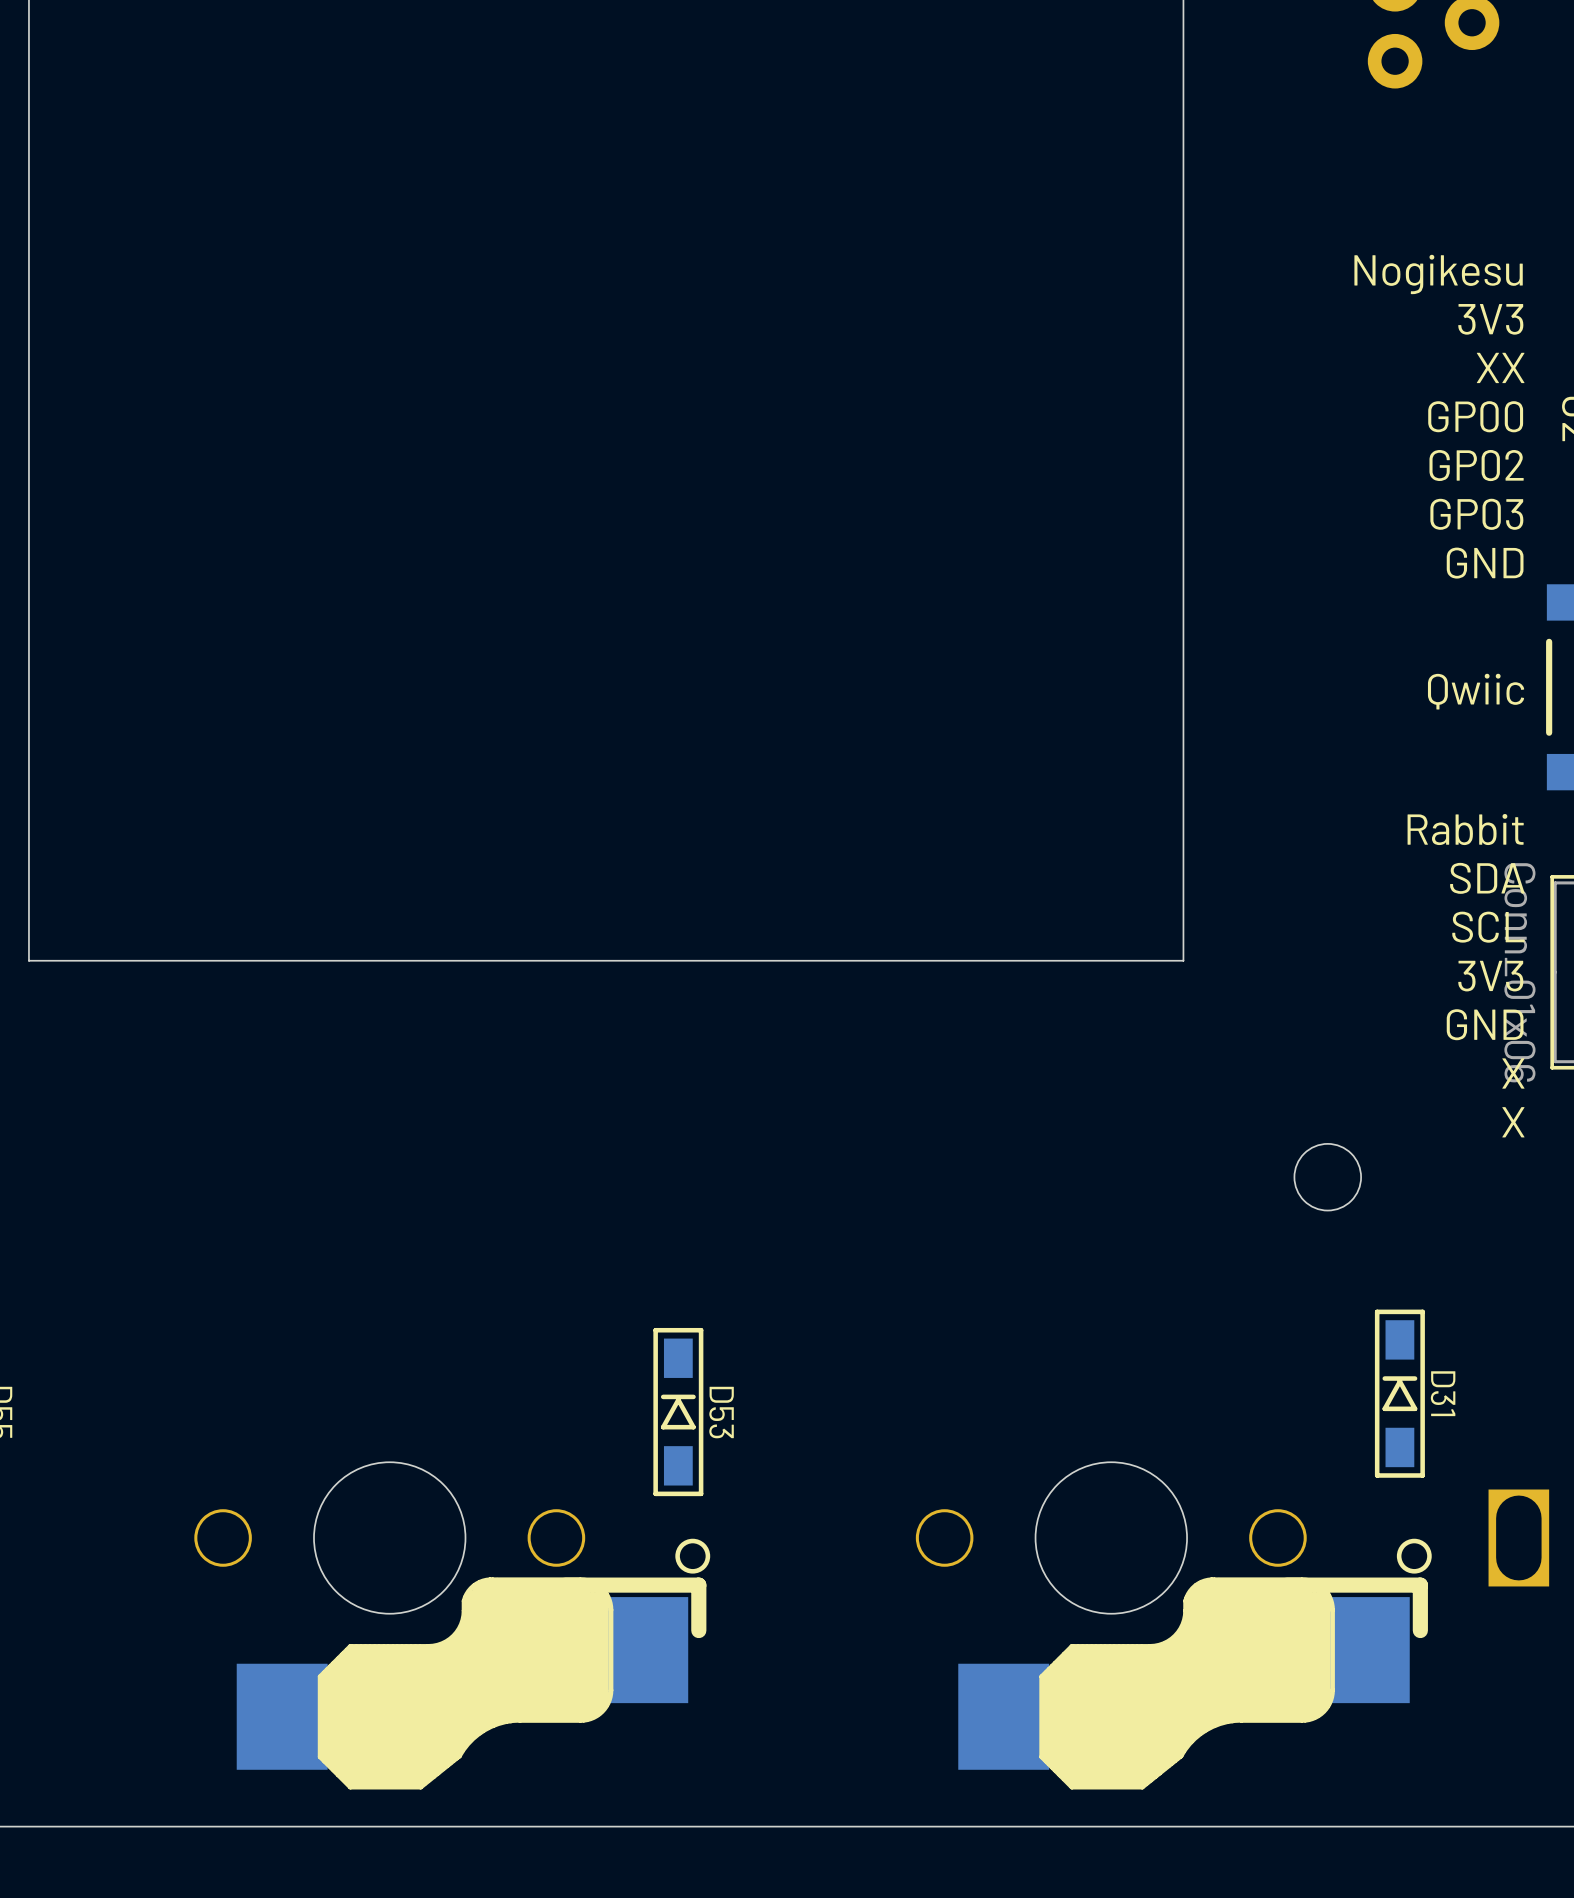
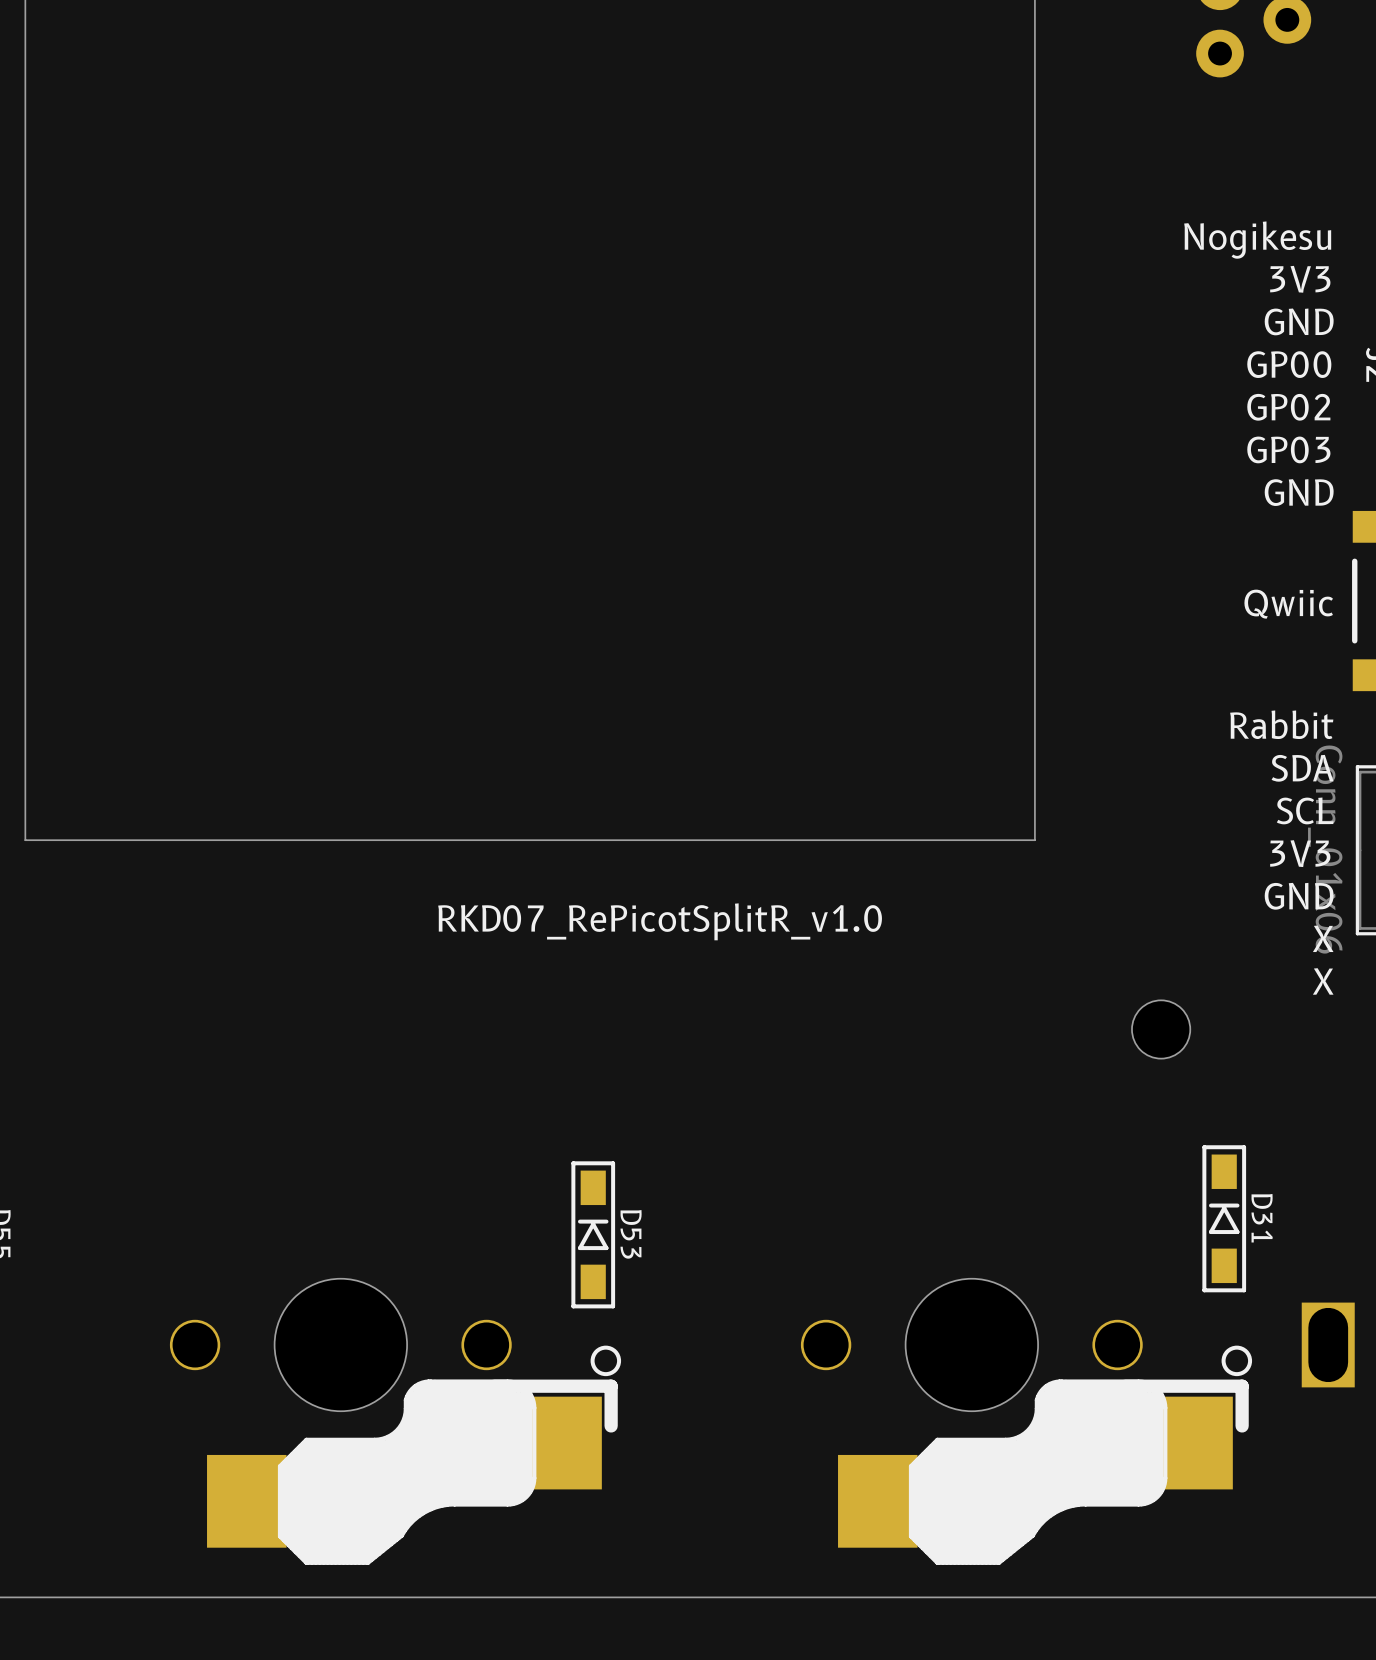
text: XX (1500, 367) -> GND (1299, 321)
text: none -> RKD07_RePicotSplitR_v1.0 (660, 921)

